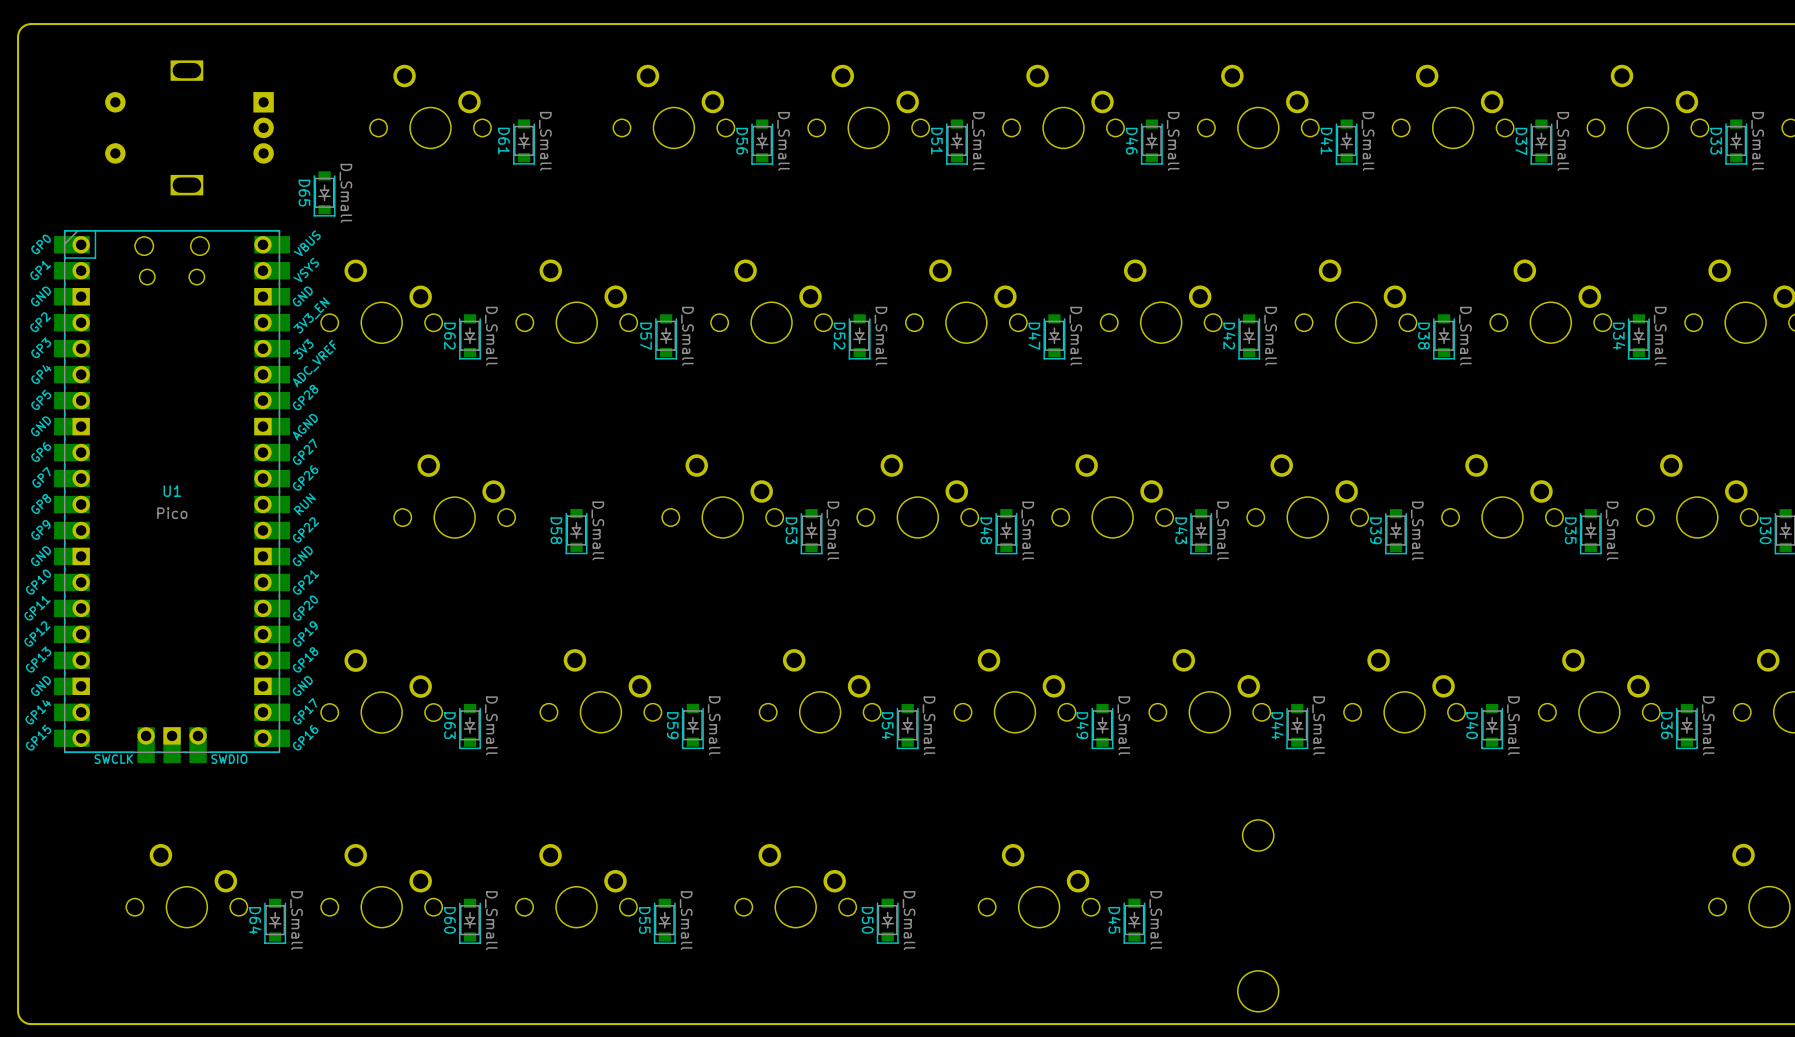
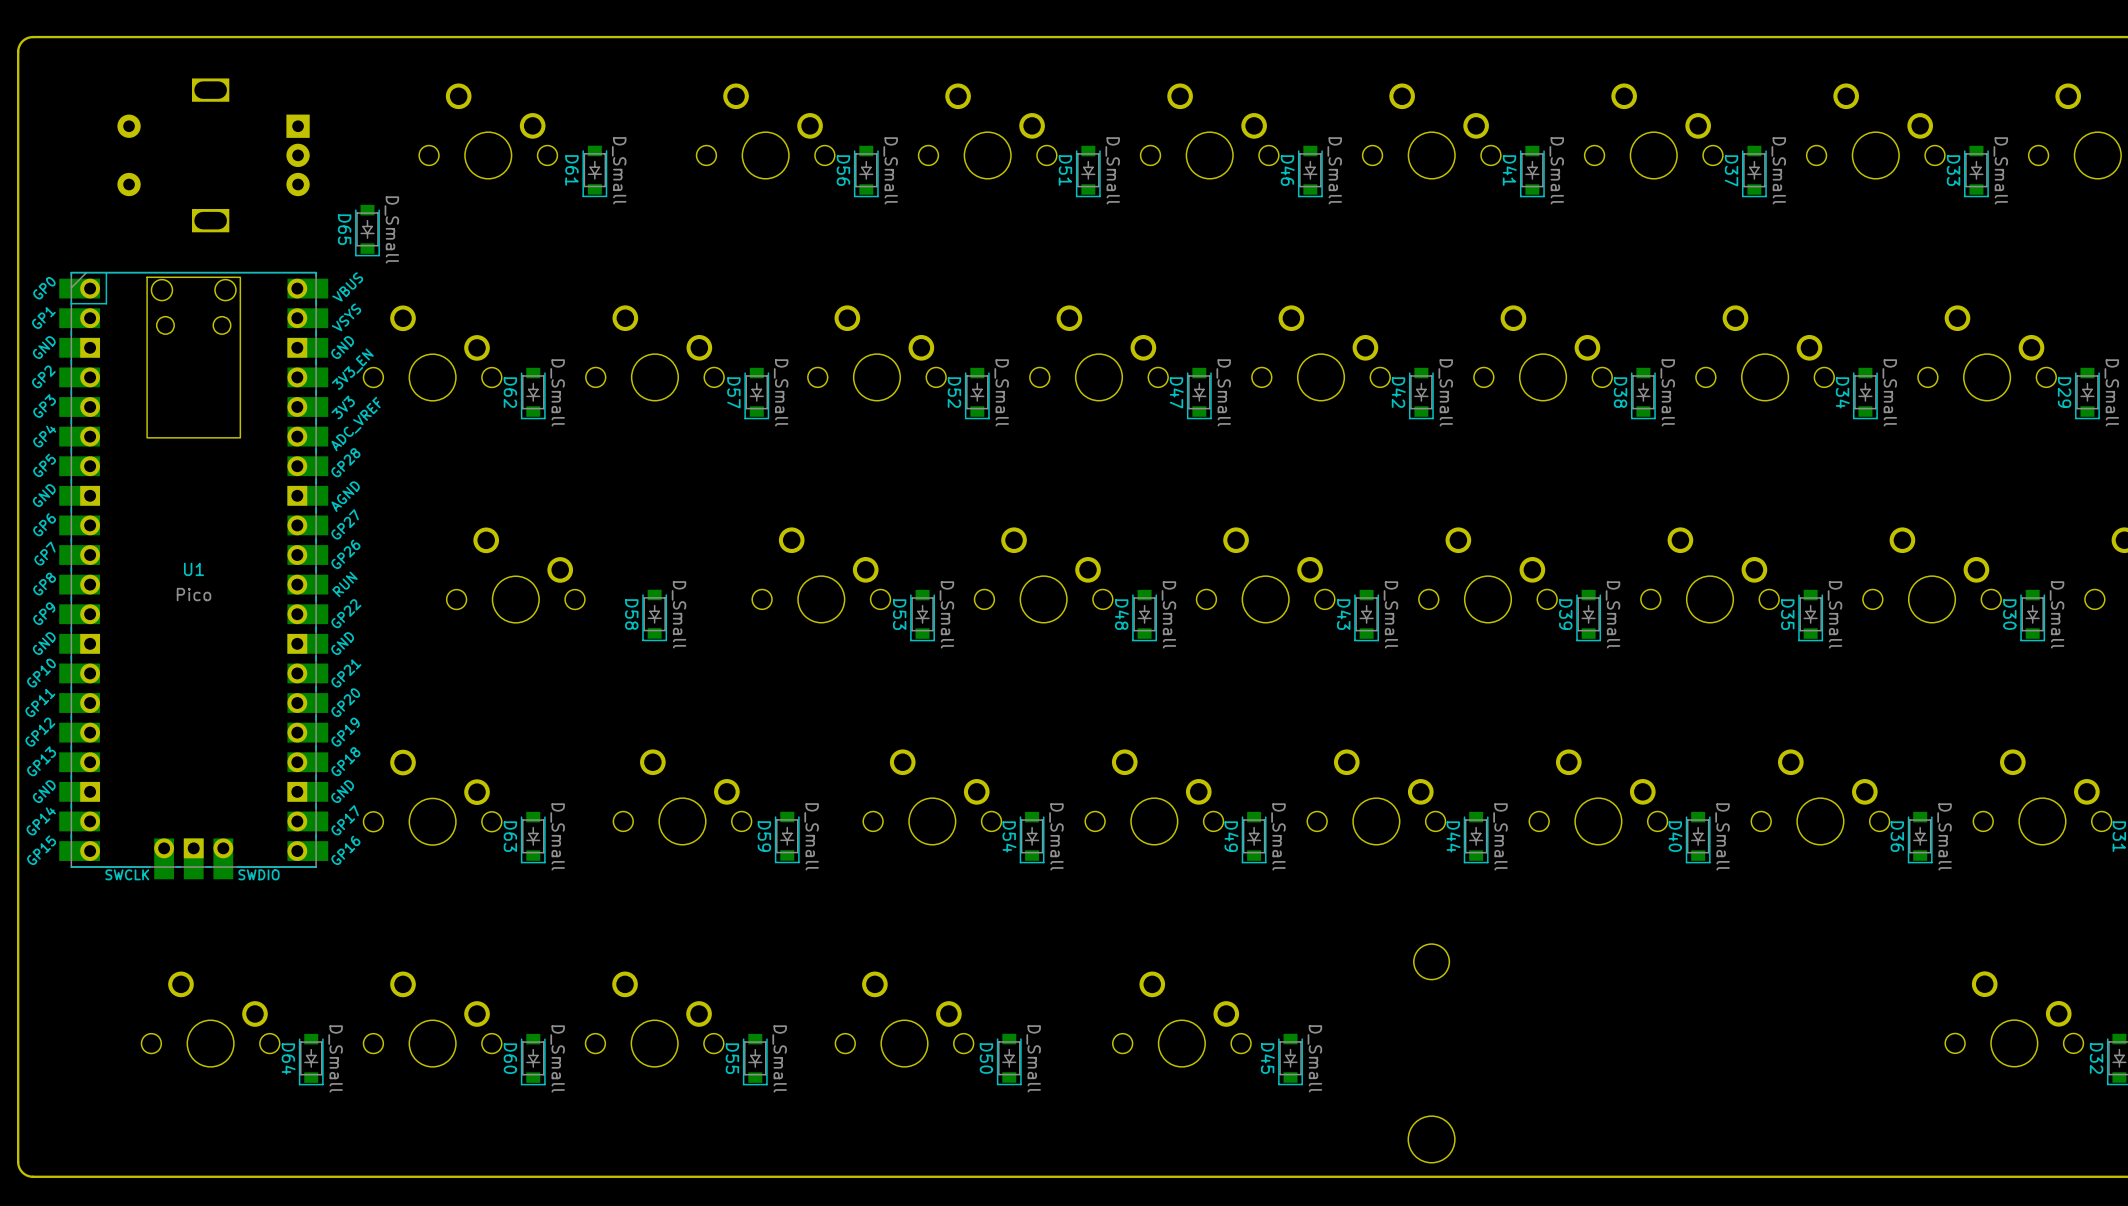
U1 footprint: [54, 230, 291, 764] -> [59, 271, 329, 880]

